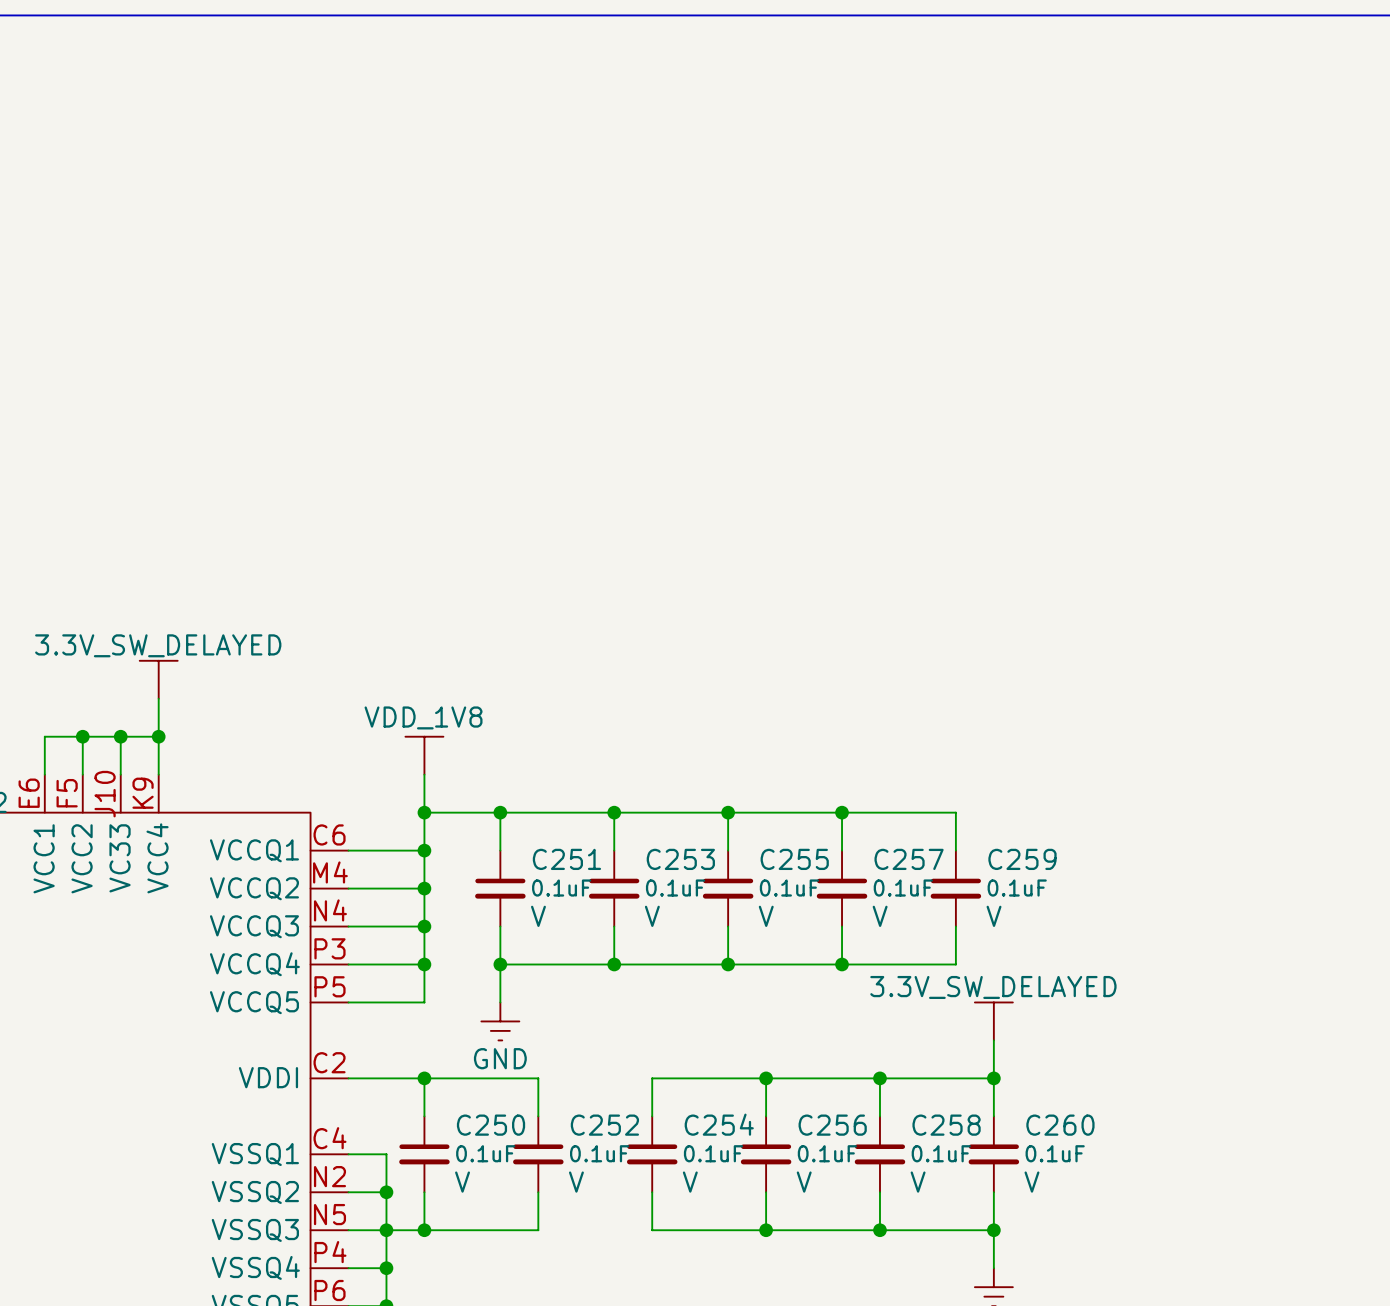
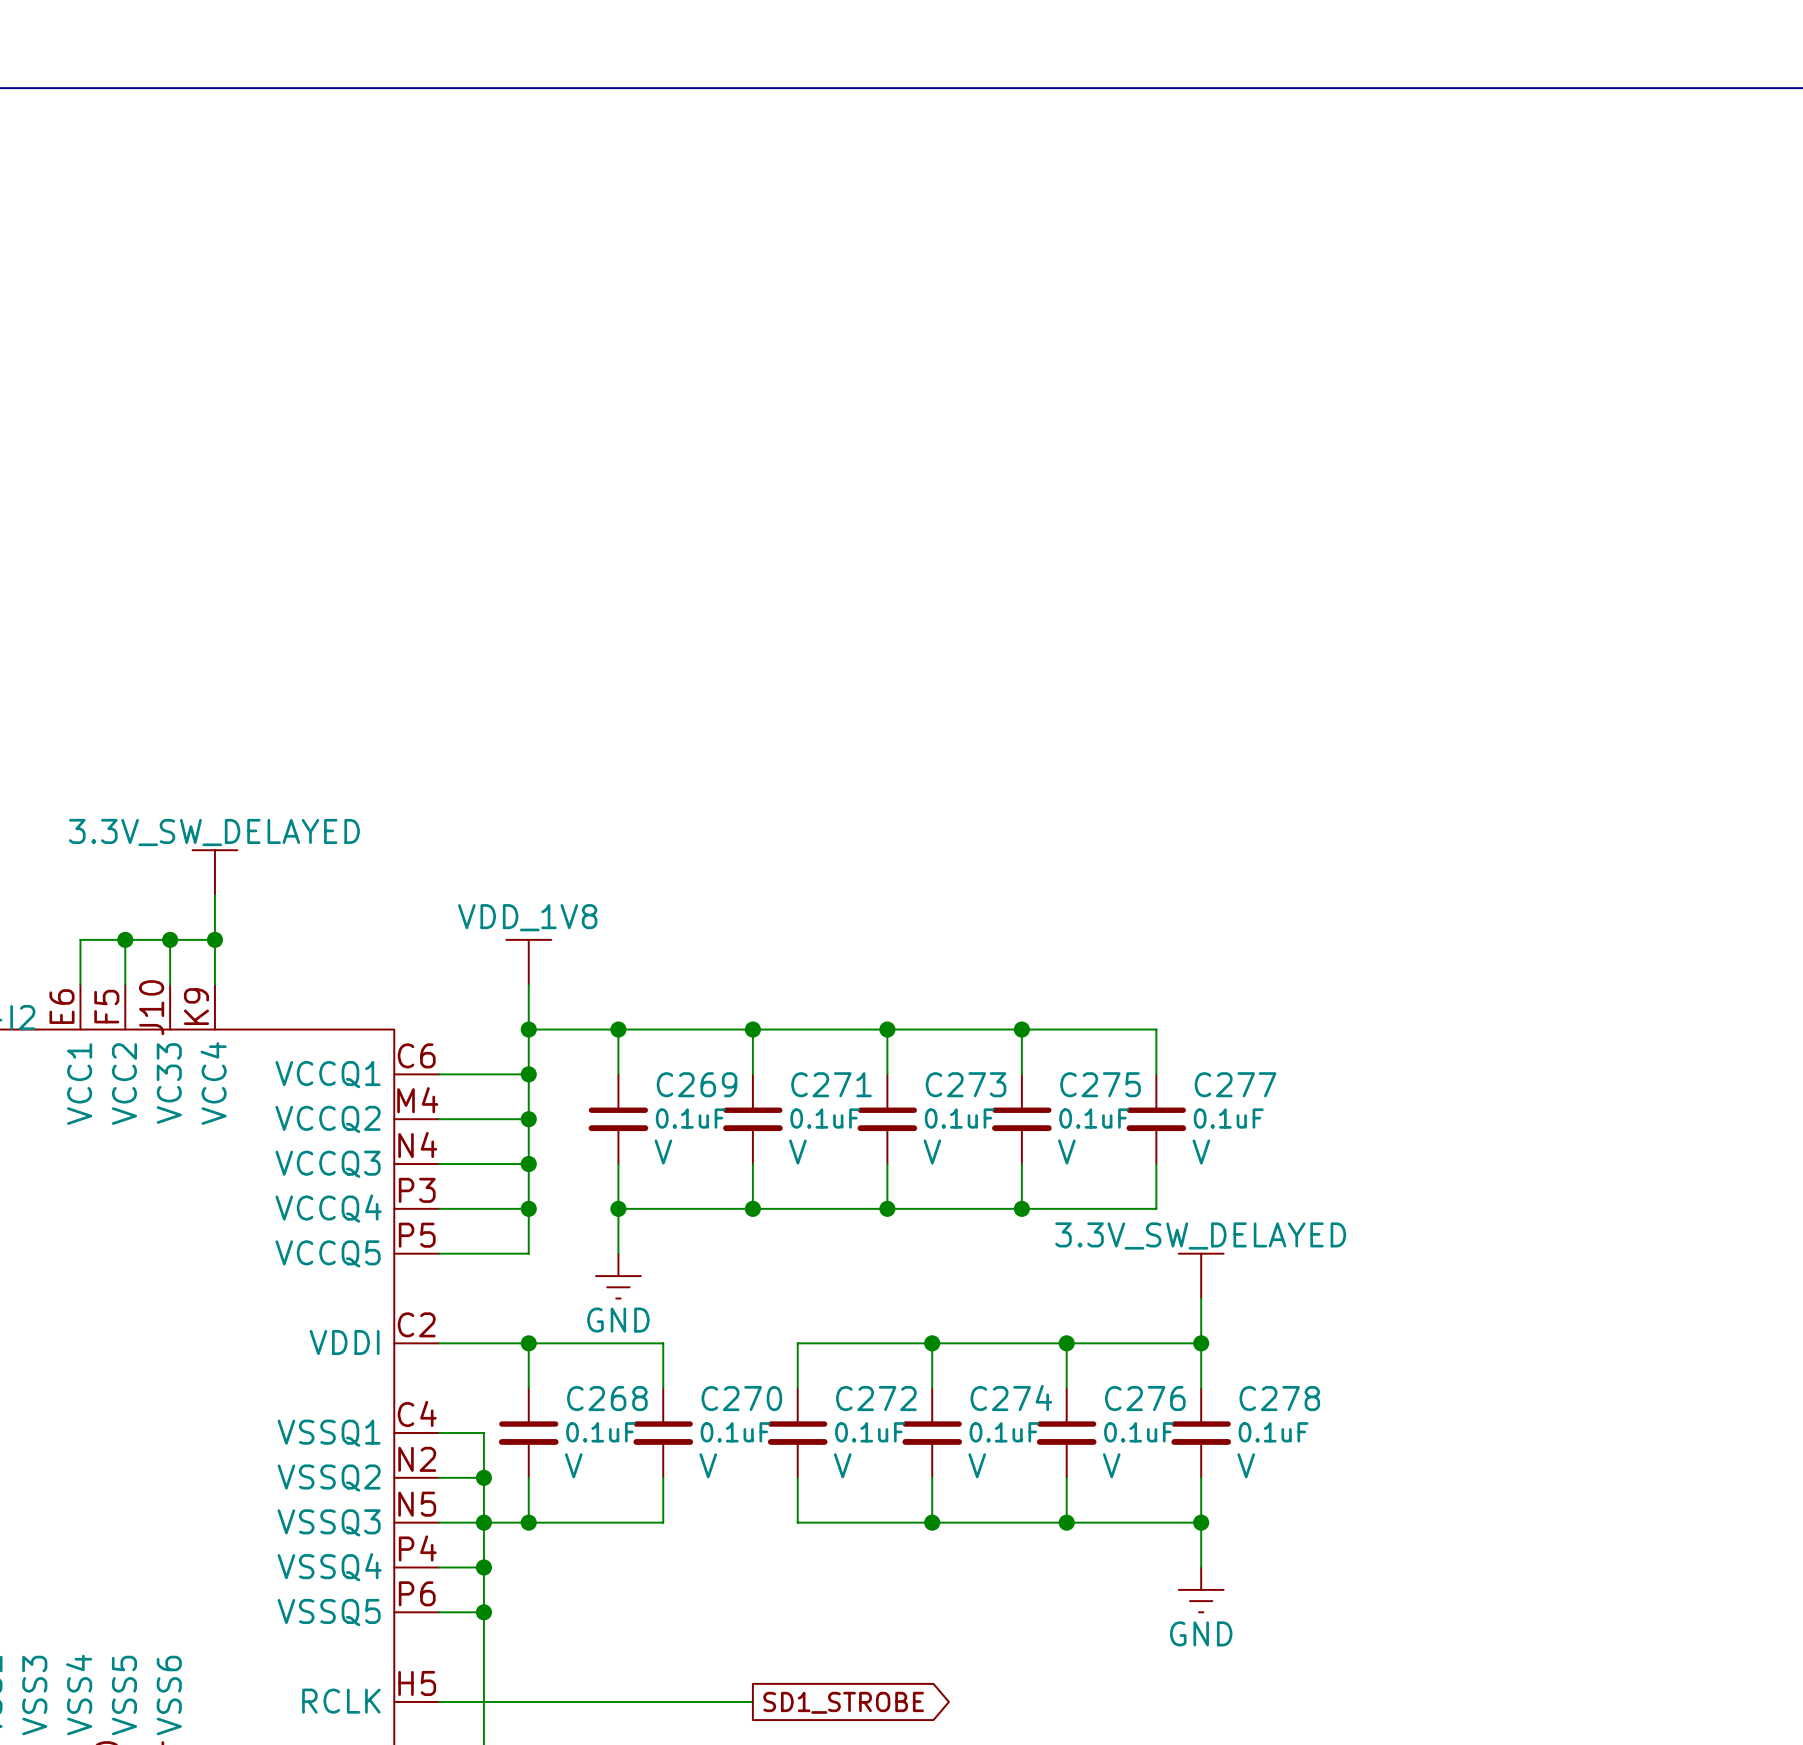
C251 name: C251 (566, 859) -> C269 (697, 1084)
C253 name: C253 (680, 859) -> C271 (831, 1084)
C255 name: C255 (794, 859) -> C273 (966, 1084)
C257 name: C257 (909, 859) -> C275 (1100, 1084)
C259 name: C259 (1022, 859) -> C277 (1235, 1084)
C254 name: C254 (719, 1124) -> C272 (876, 1398)
C250 name: C250 (491, 1125) -> C268 (607, 1398)
C252 name: C252 (604, 1125) -> C270 (741, 1398)
C256 name: C256 (832, 1125) -> C274 (1011, 1398)
C258 name: C258 (946, 1125) -> C276 (1145, 1398)
C260 name: C260 (1060, 1125) -> C278 (1279, 1398)

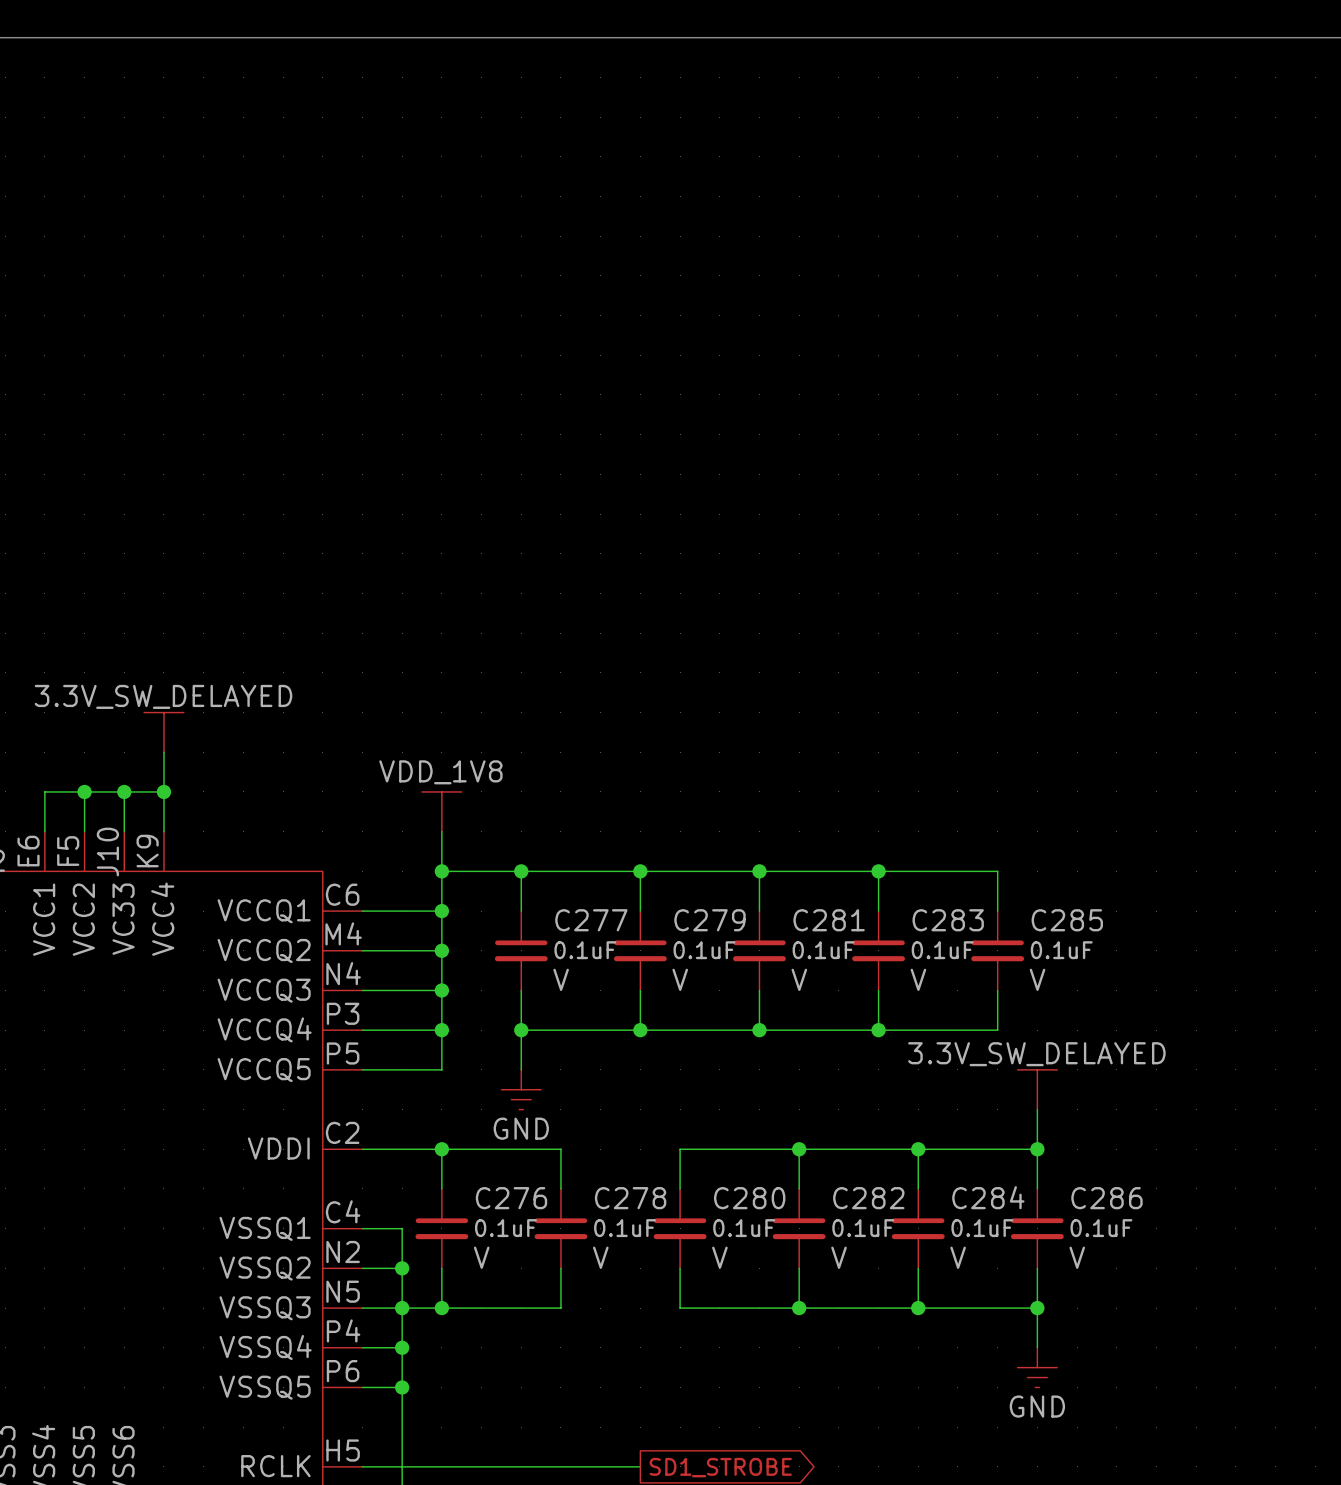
C269 name: C269 (697, 1084) -> C277 (591, 920)
C271 name: C271 (831, 1084) -> C279 (709, 920)
C273 name: C273 (966, 1084) -> C281 (829, 920)
C275 name: C275 (1100, 1084) -> C283 (948, 920)
C277 name: C277 (1235, 1084) -> C285 (1067, 920)
C268 name: C268 (607, 1398) -> C276 (511, 1198)
C270 name: C270 (741, 1398) -> C278 (630, 1198)
C272 name: C272 (876, 1398) -> C280 (749, 1198)
C274 name: C274 (1011, 1398) -> C282 (868, 1198)
C276 name: C276 (1145, 1398) -> C284 (988, 1197)
C278 name: C278 (1279, 1398) -> C286 (1106, 1198)

